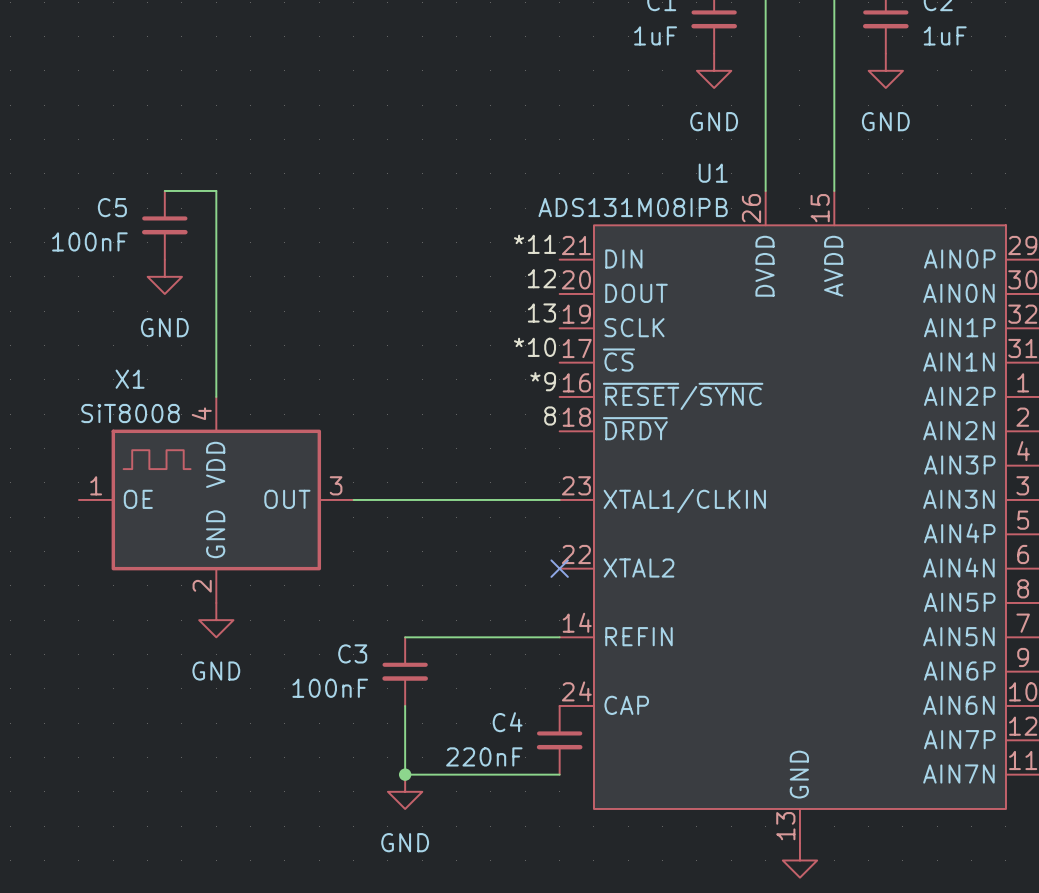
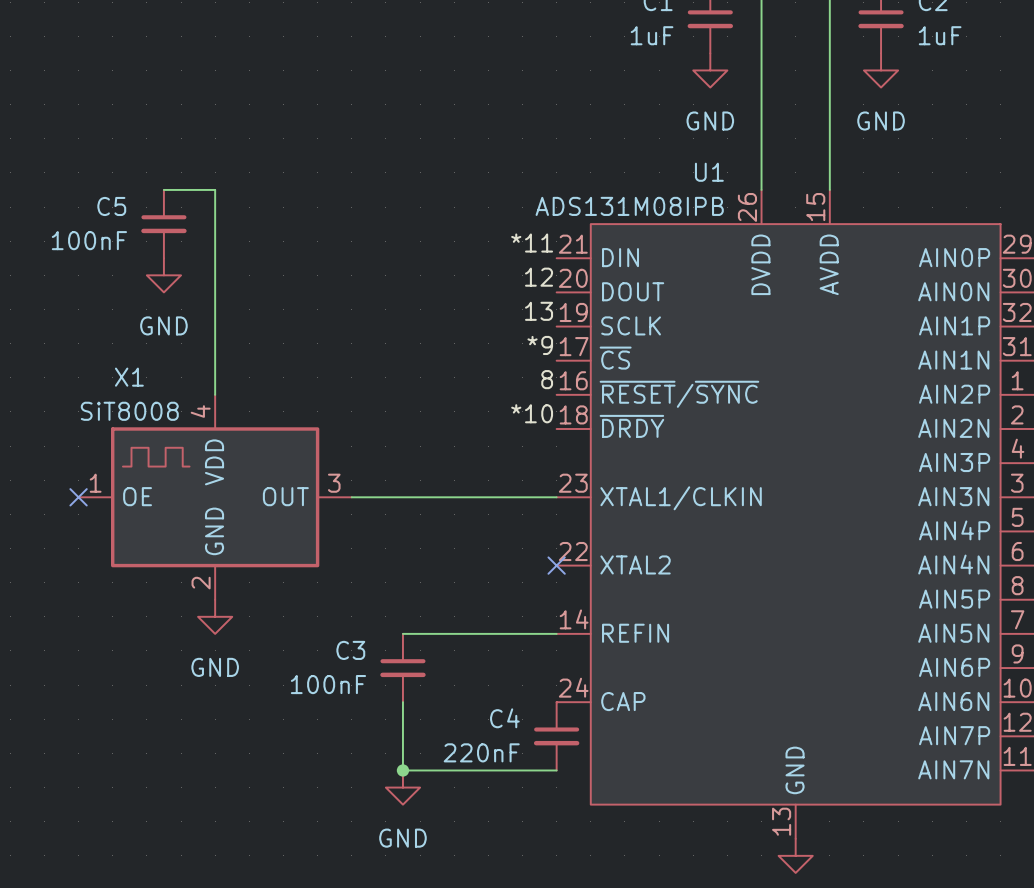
label: *10 (535, 347) -> *9 (540, 345)
label: *9 (543, 381) -> 8 (547, 379)
label: 8 (550, 416) -> *10 (532, 413)
no-connect mark: none -> (78, 497)

